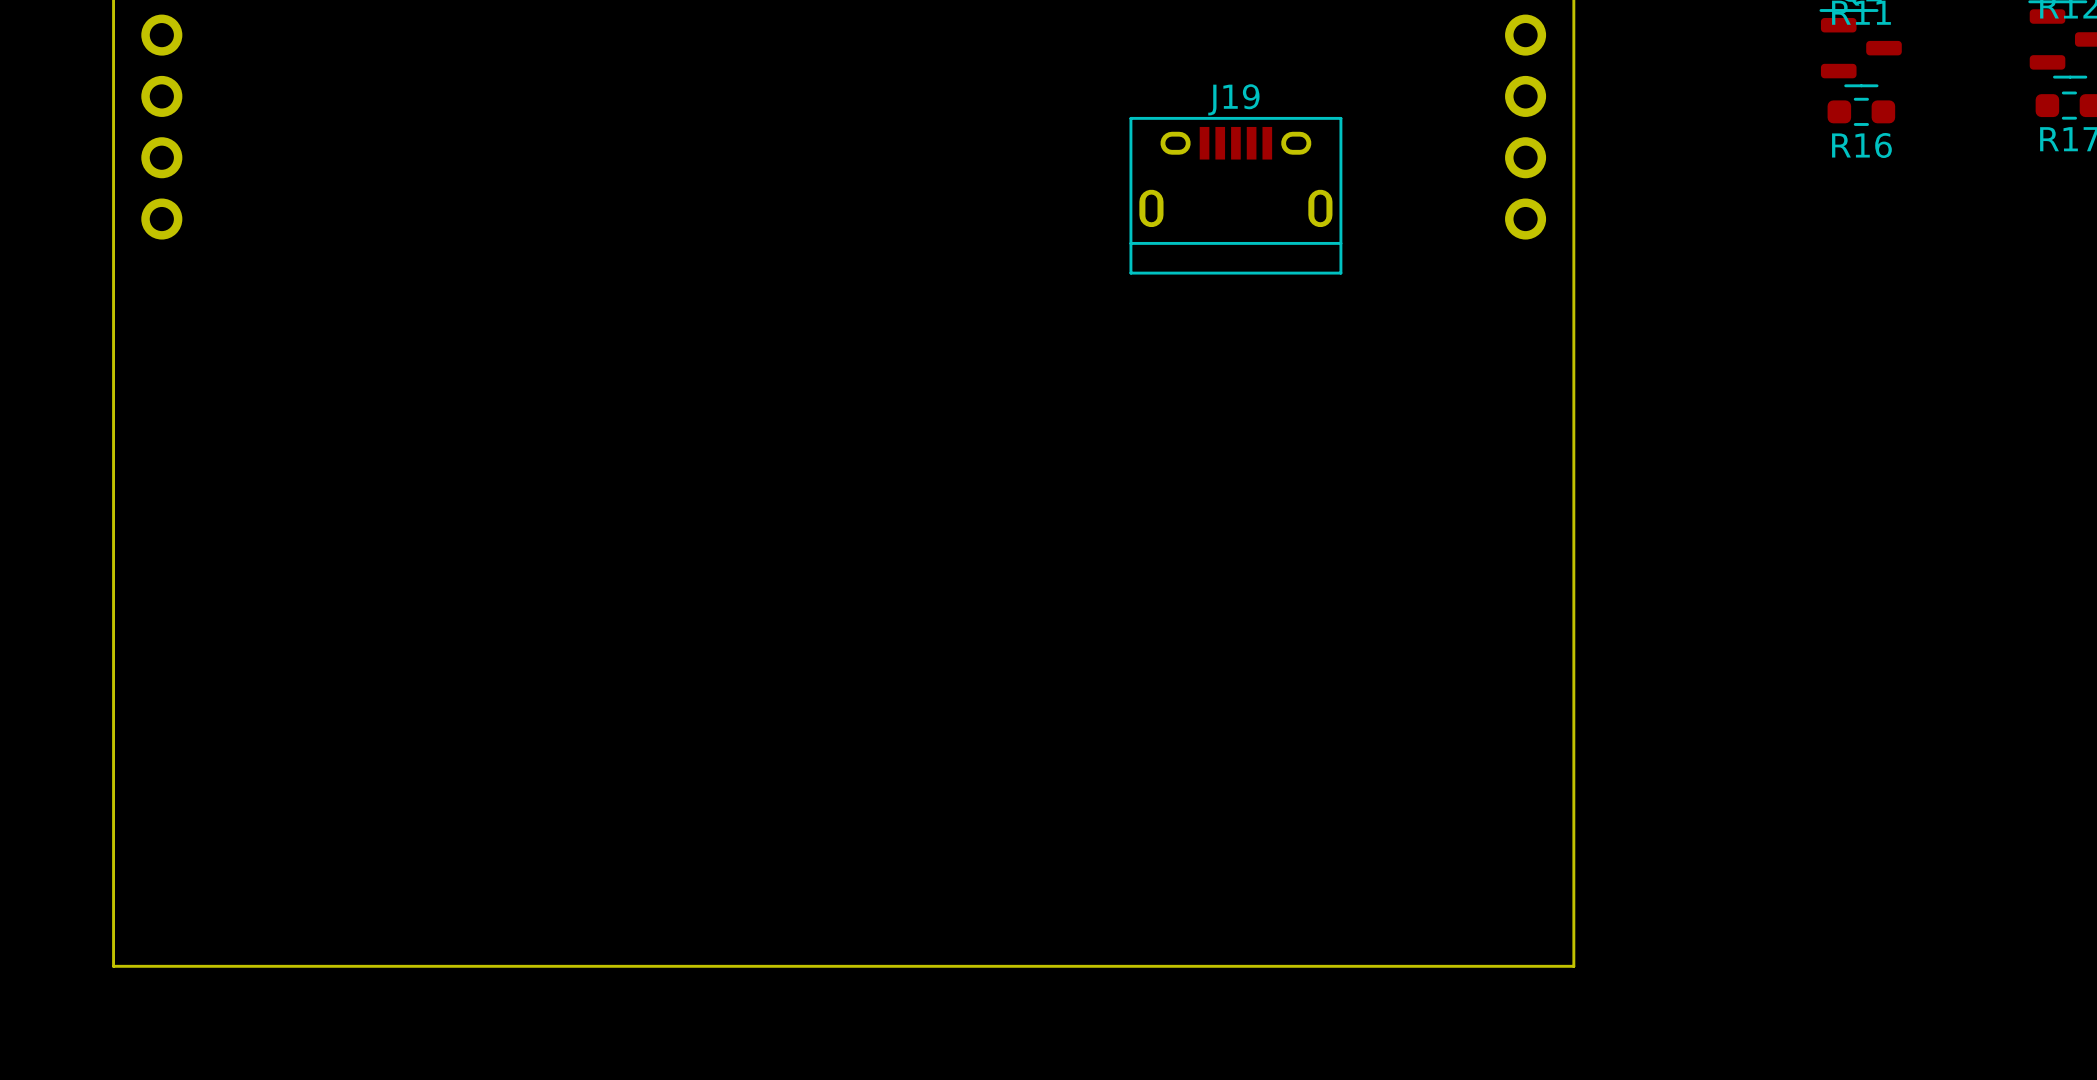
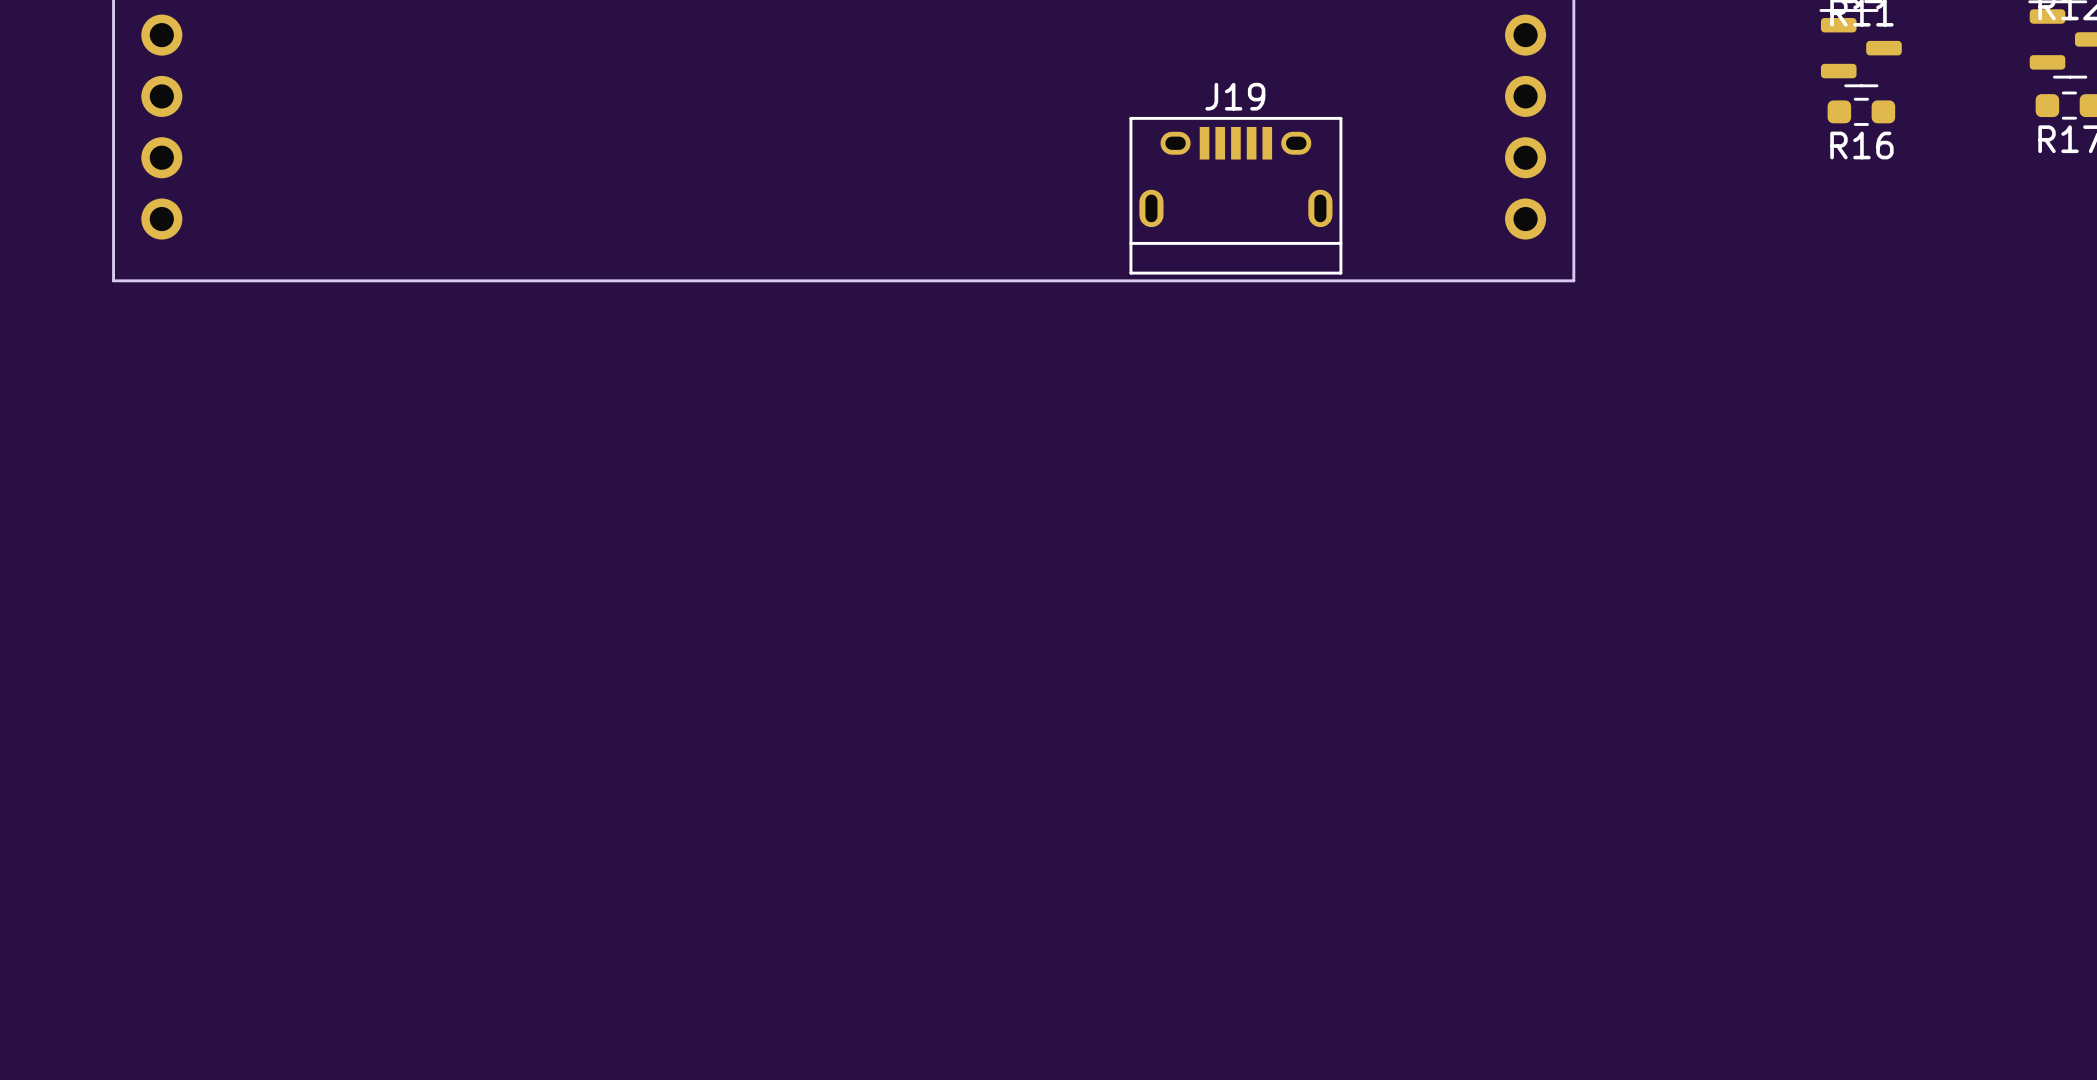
board edge: (113, 280) (113, 966) (1573, 966) (1573, 280) -> (113, 280) (1573, 280)

